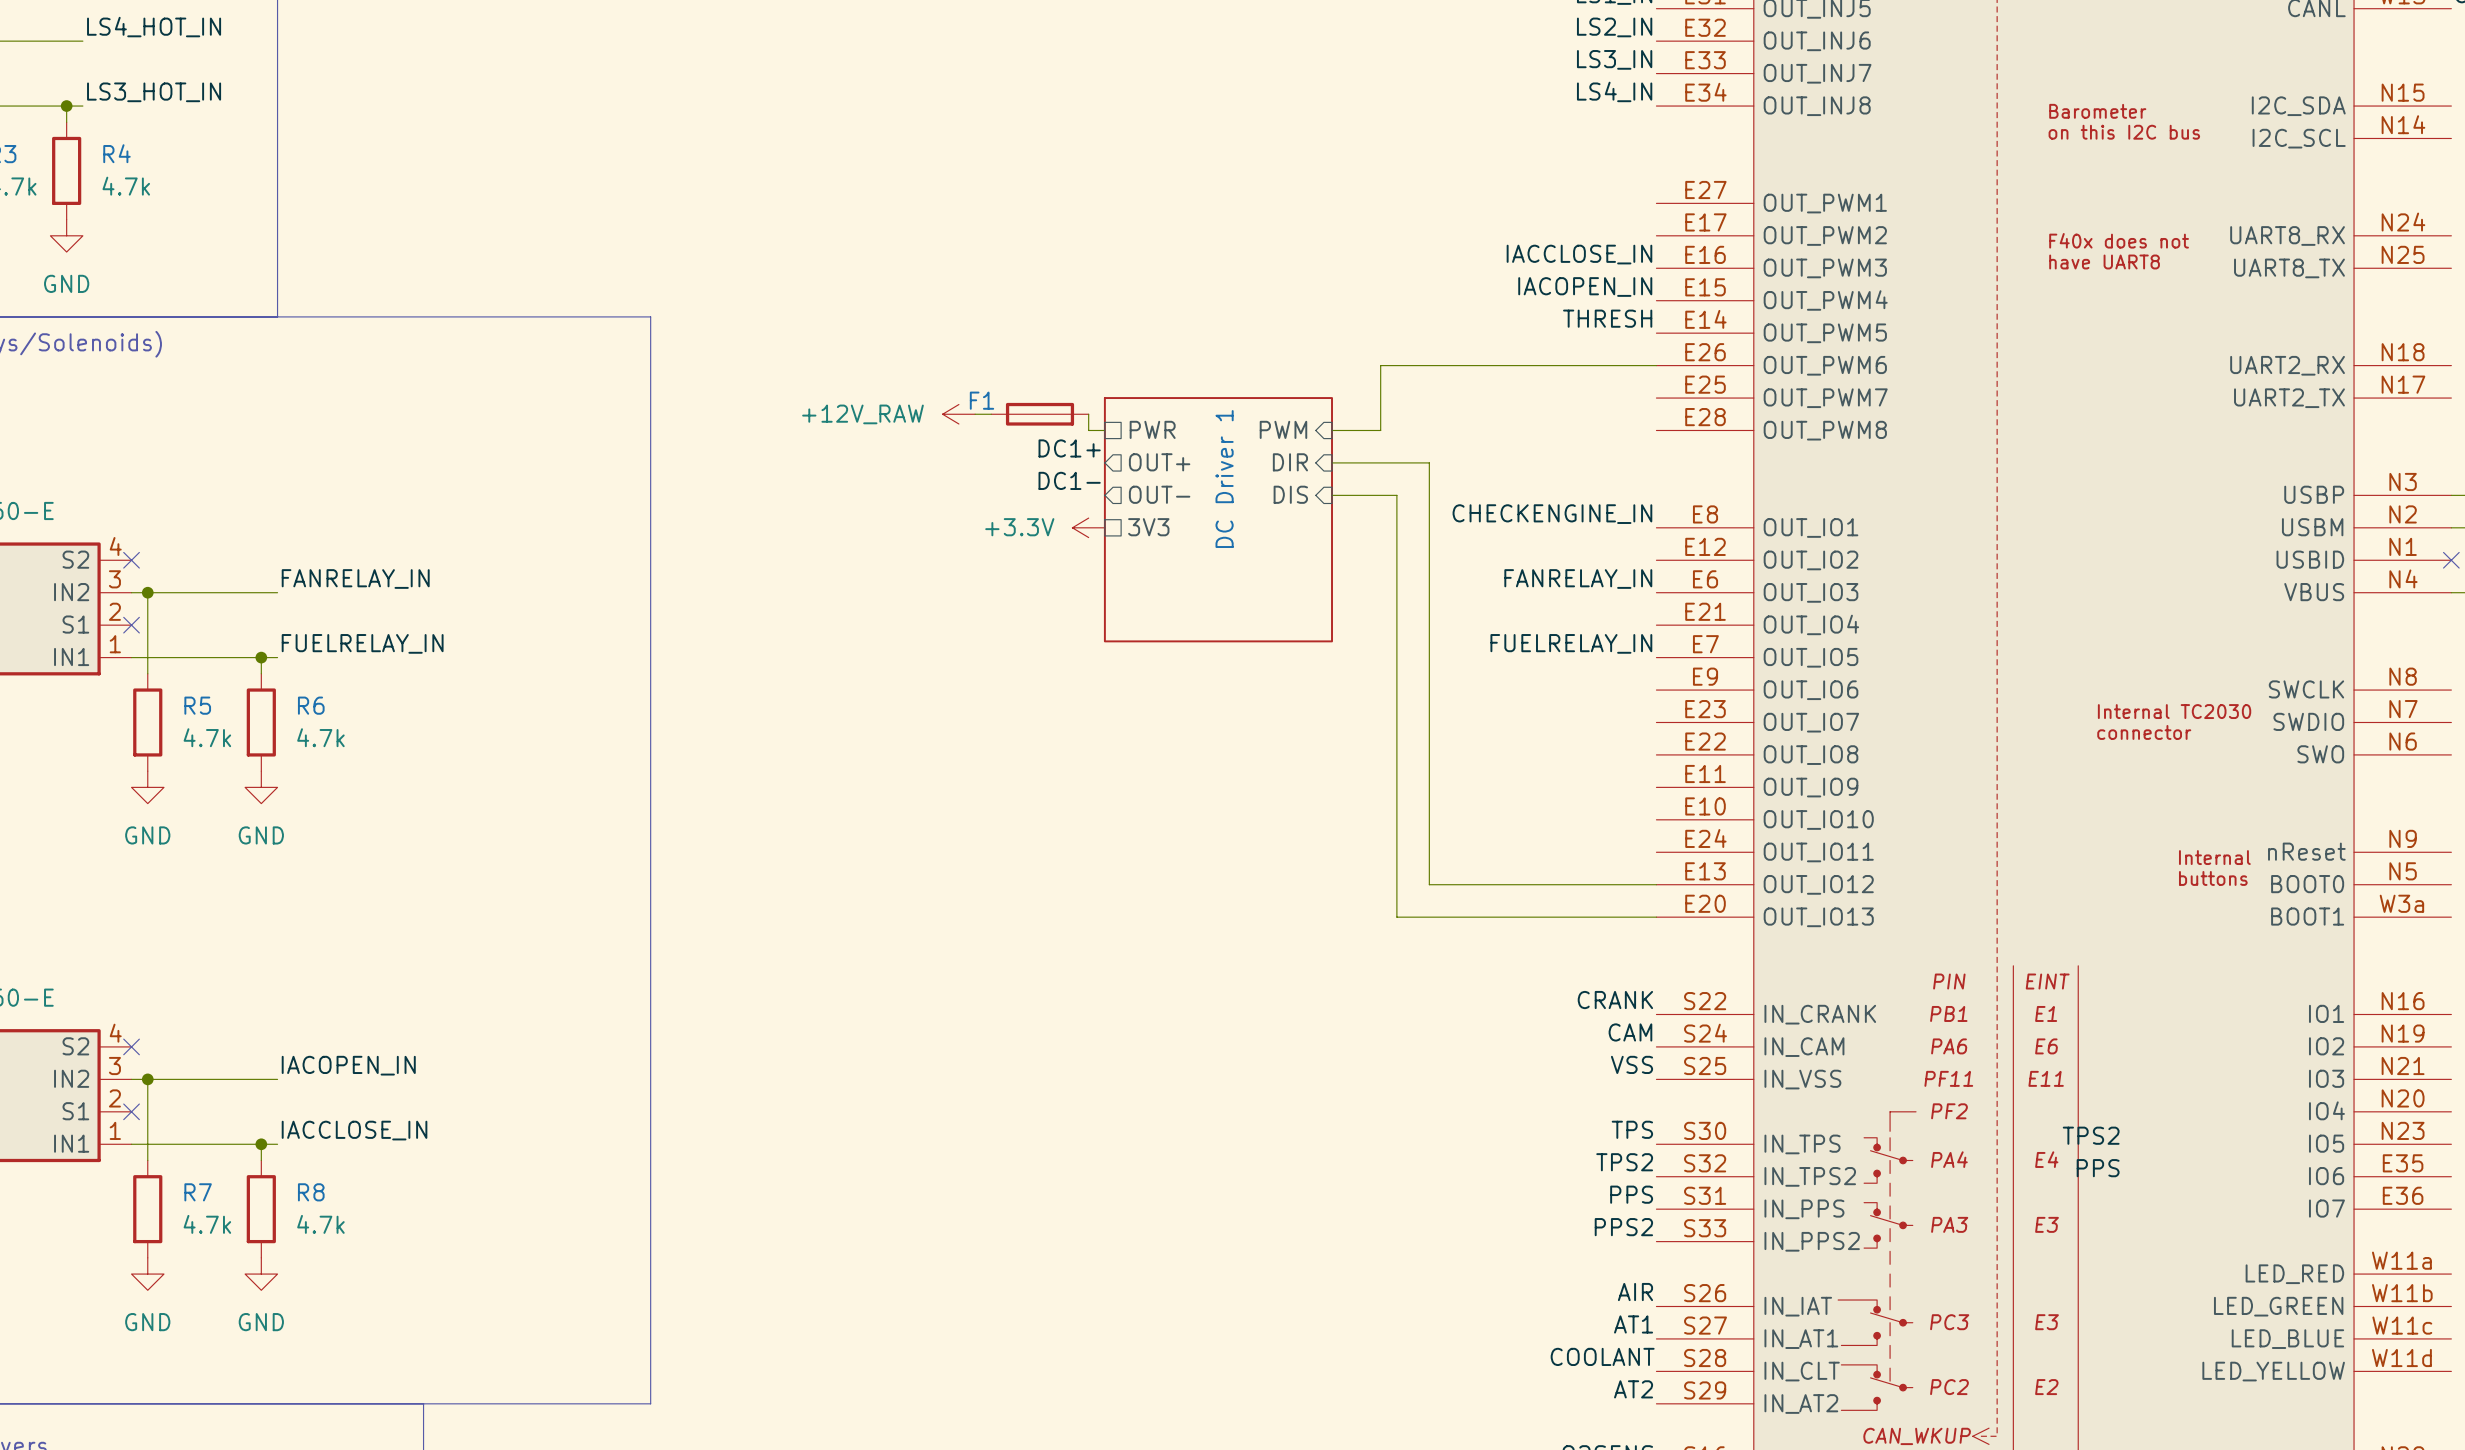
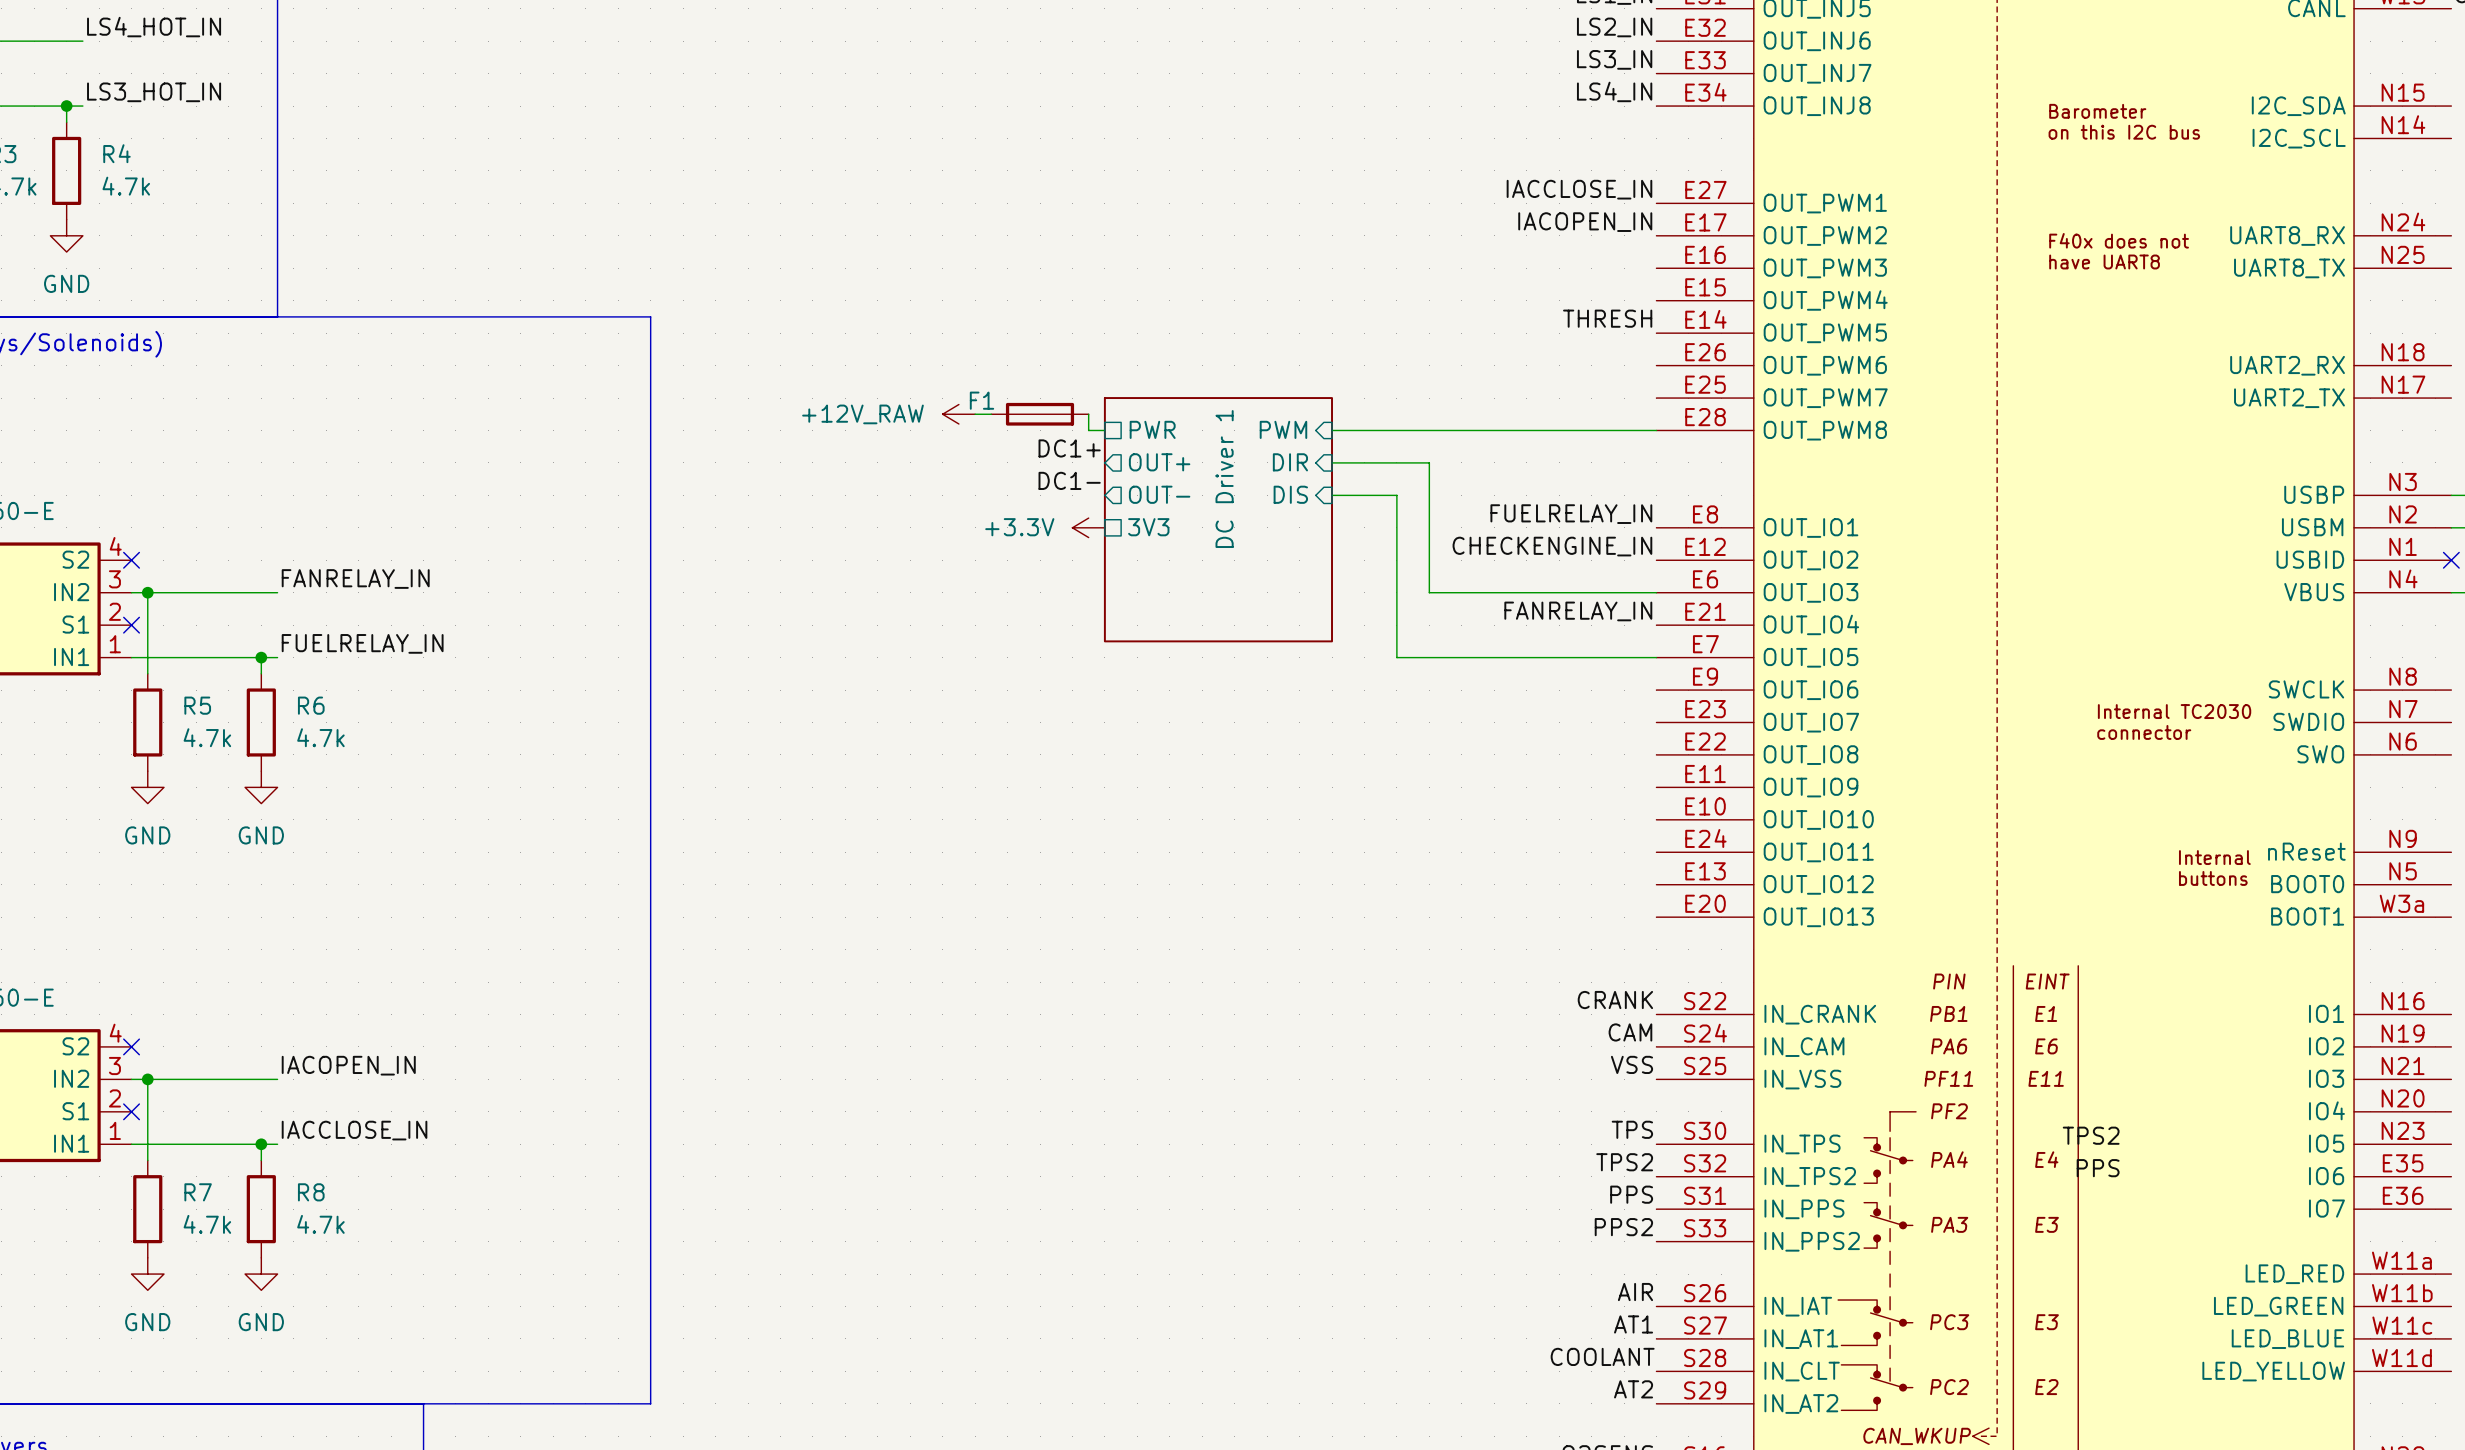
label position: IACCLOSE_IN (1579, 254) -> IACCLOSE_IN (1579, 189)
label position: IACOPEN_IN (1585, 287) -> IACOPEN_IN (1585, 222)
wire: (1656, 365) (1380, 365) (1380, 430) -> (1656, 430) (1380, 430)
label: CHECKENGINE_IN (1552, 514) -> FUELRELAY_IN (1571, 514)
label: none -> CHECKENGINE_IN (1552, 546)
label position: FANRELAY_IN (1578, 579) -> FANRELAY_IN (1578, 611)
wire: (1429, 592) (1429, 884) (1656, 884) -> (1429, 592) (1656, 592)
label: FUELRELAY_IN (1571, 643) -> none
wire: (1396, 657) (1396, 917) (1656, 917) -> (1396, 657) (1656, 657)

